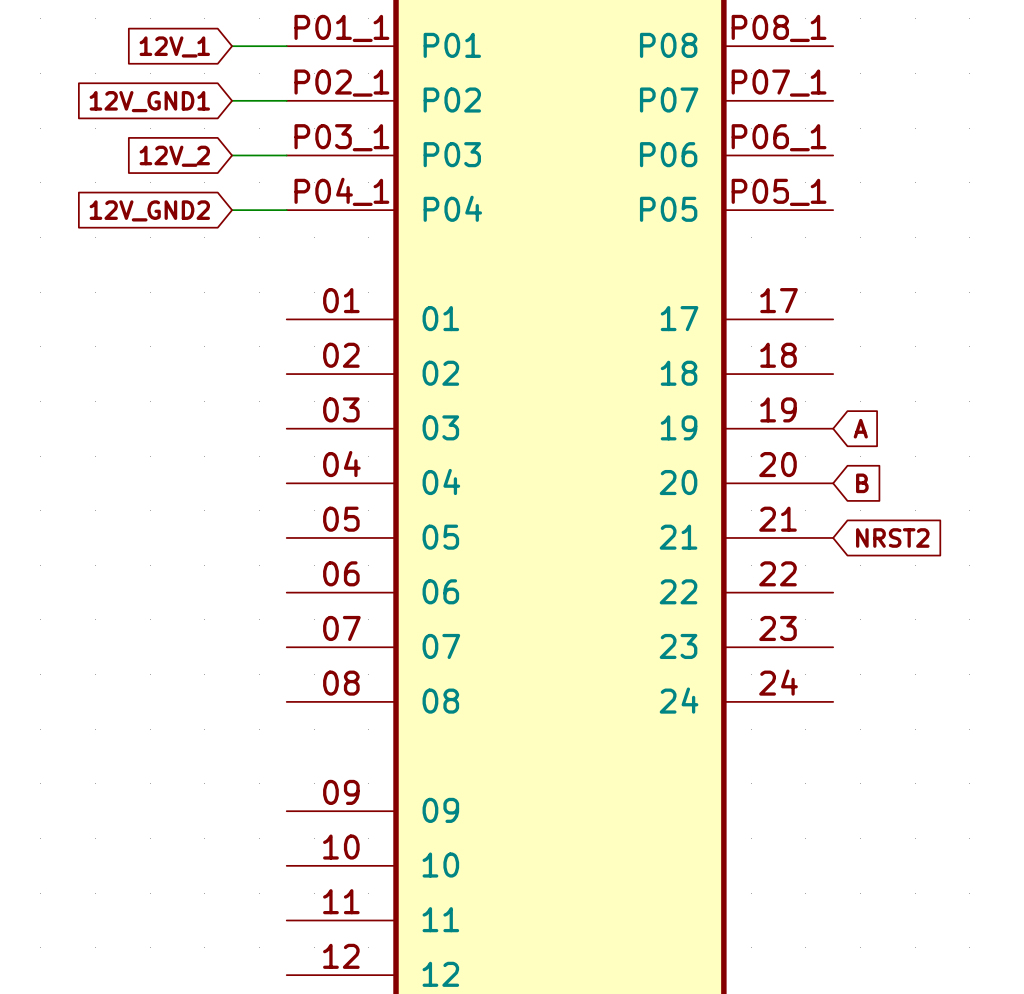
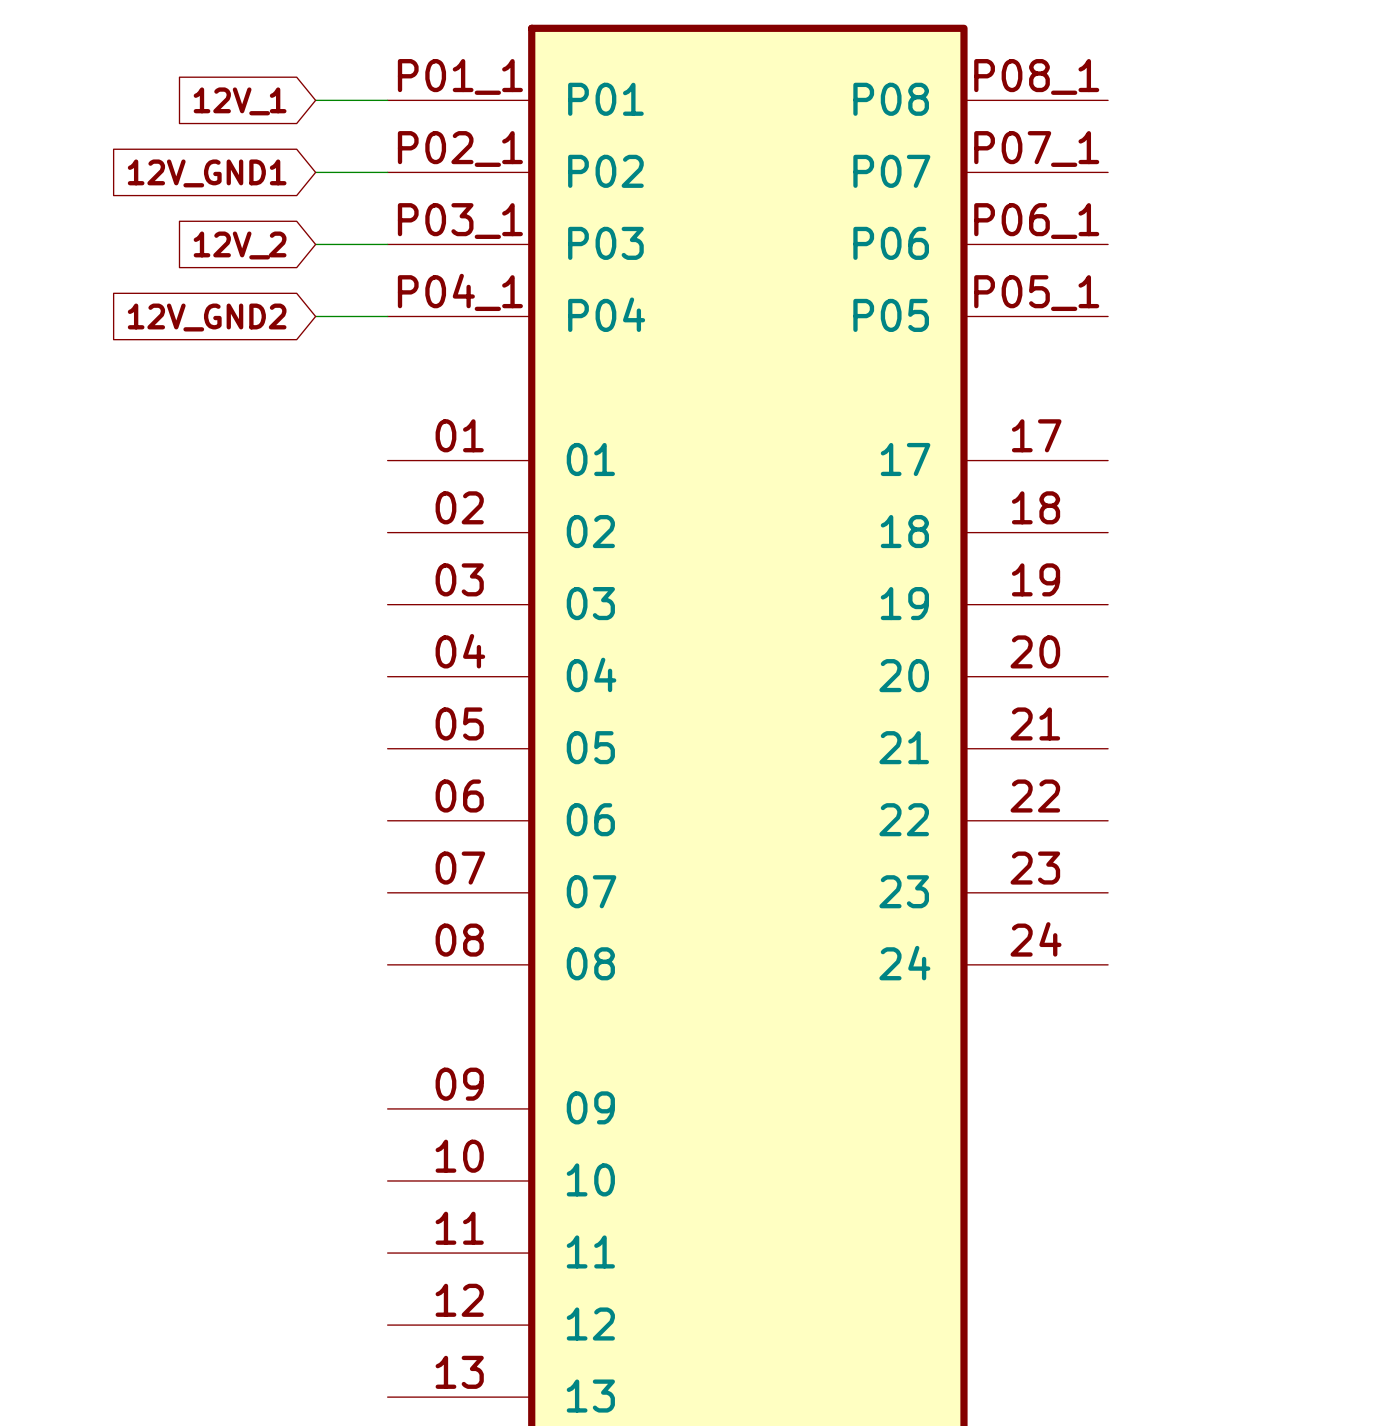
global label: A (860, 428) -> none
global label: B (862, 483) -> none
global label: NRST2 (892, 537) -> none

